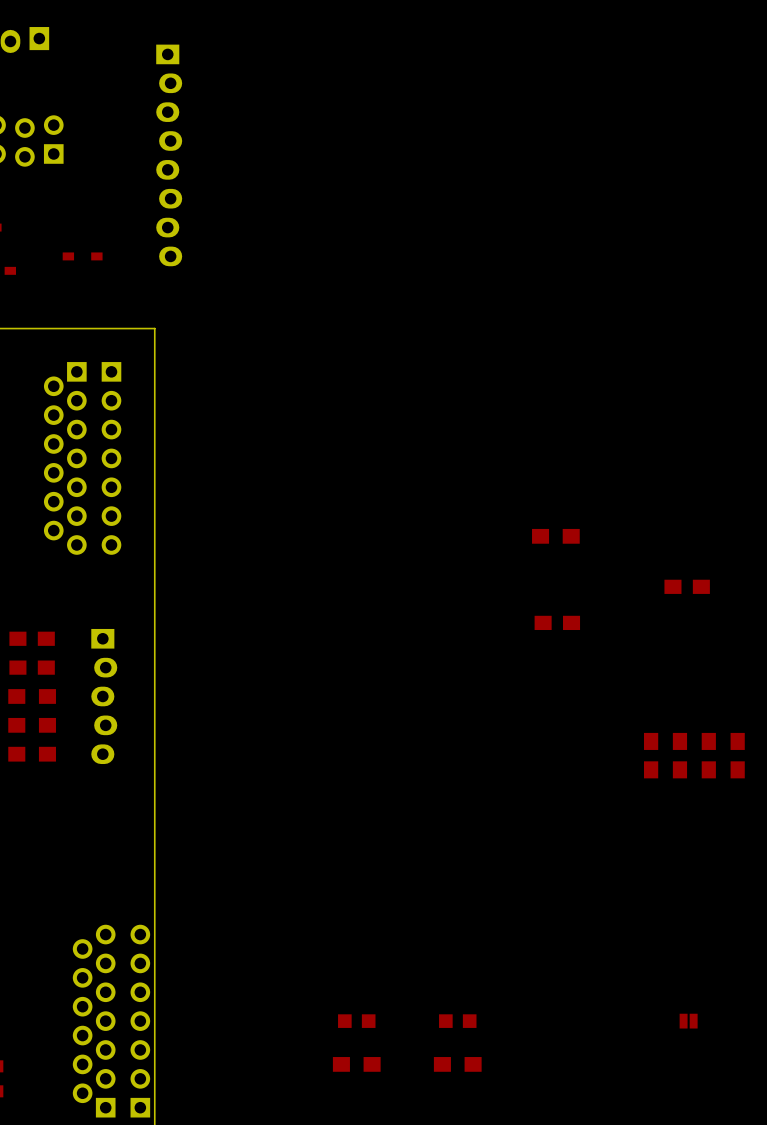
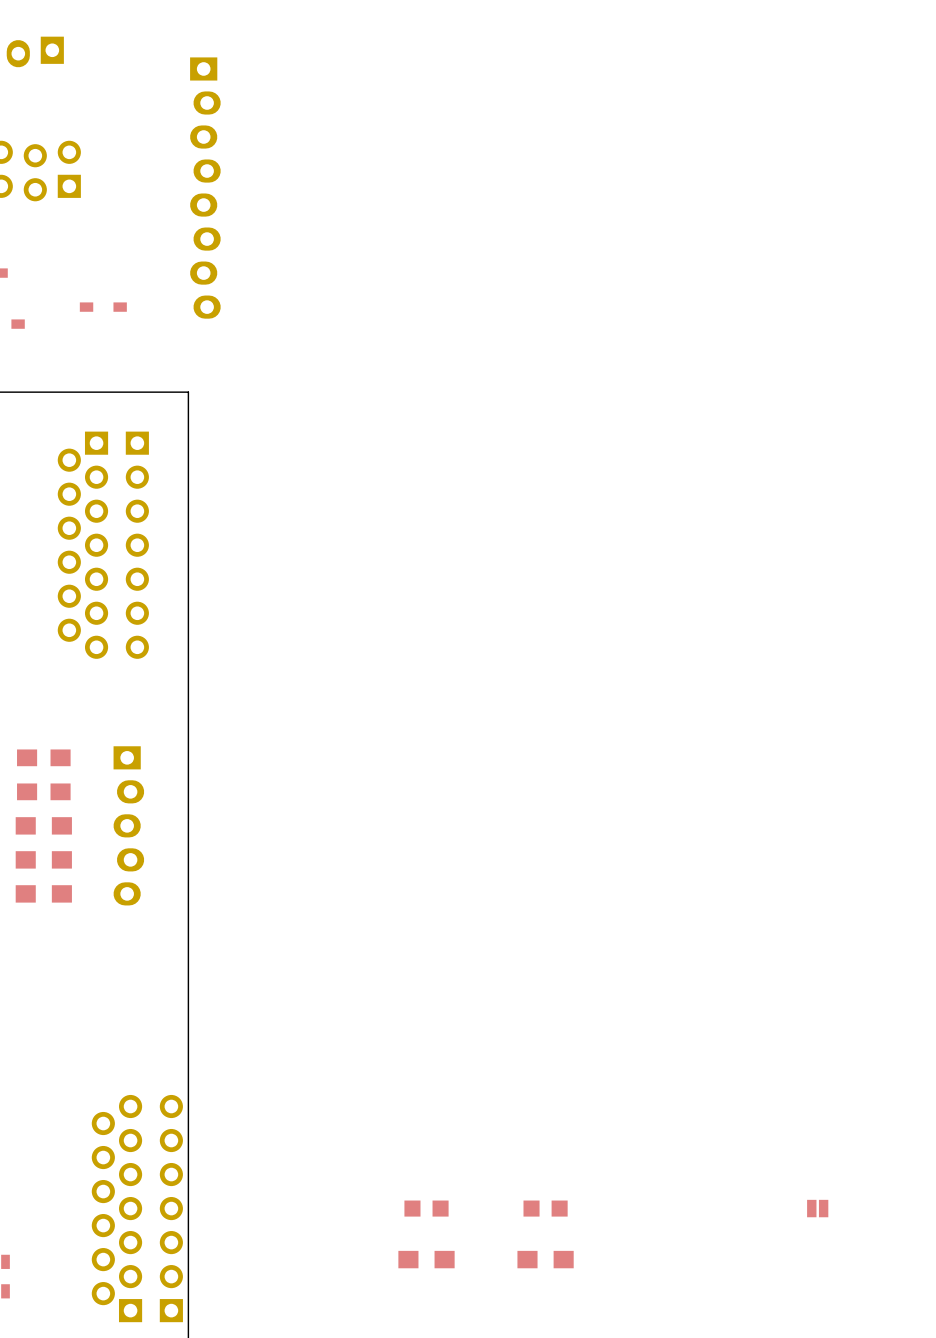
part: (555, 536) -> none
part: (687, 586) -> none
part: (557, 622) -> none
part: (651, 755) -> none
part: (679, 755) -> none
part: (708, 755) -> none
part: (737, 755) -> none

